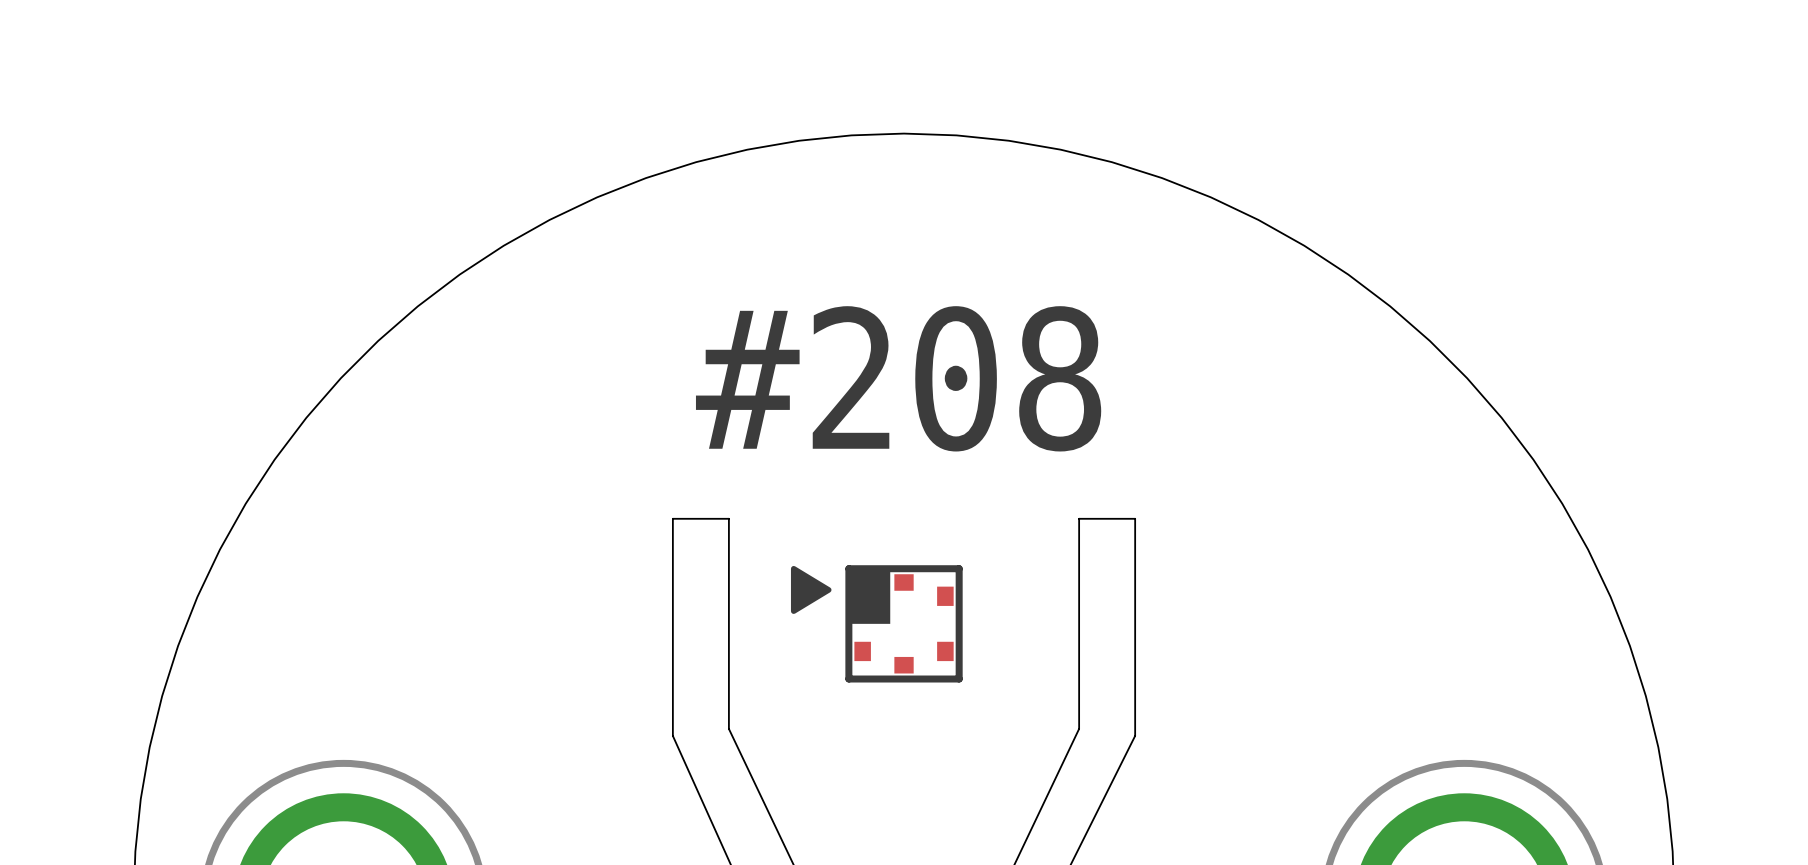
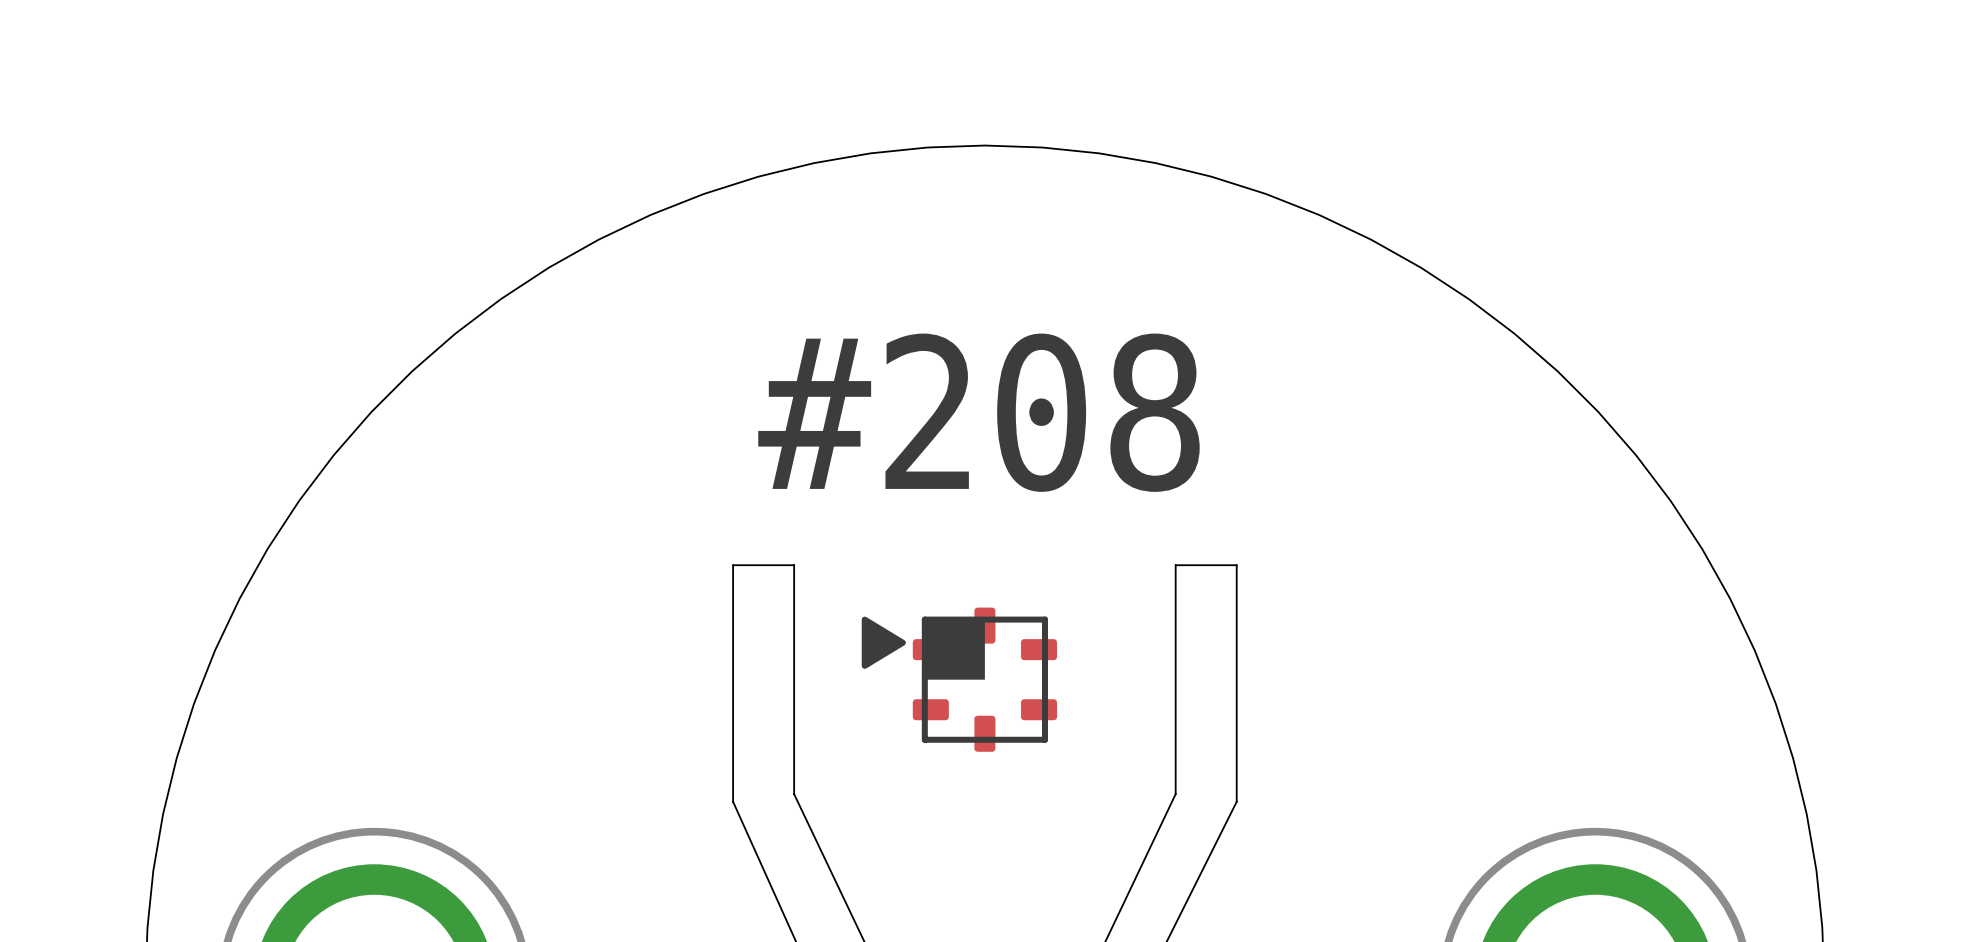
part footprint: [790, 565, 963, 683] -> [861, 607, 1058, 752]

